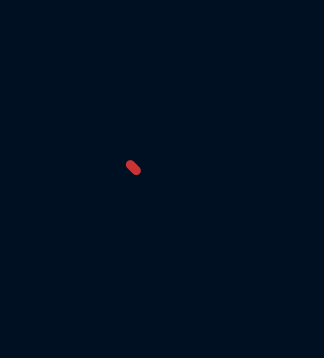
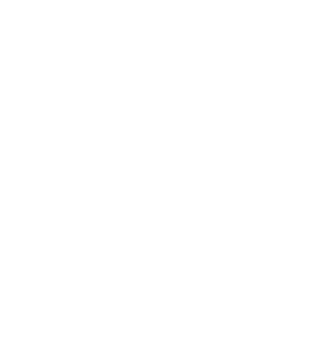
top track: (130, 164) (136, 170) -> none

